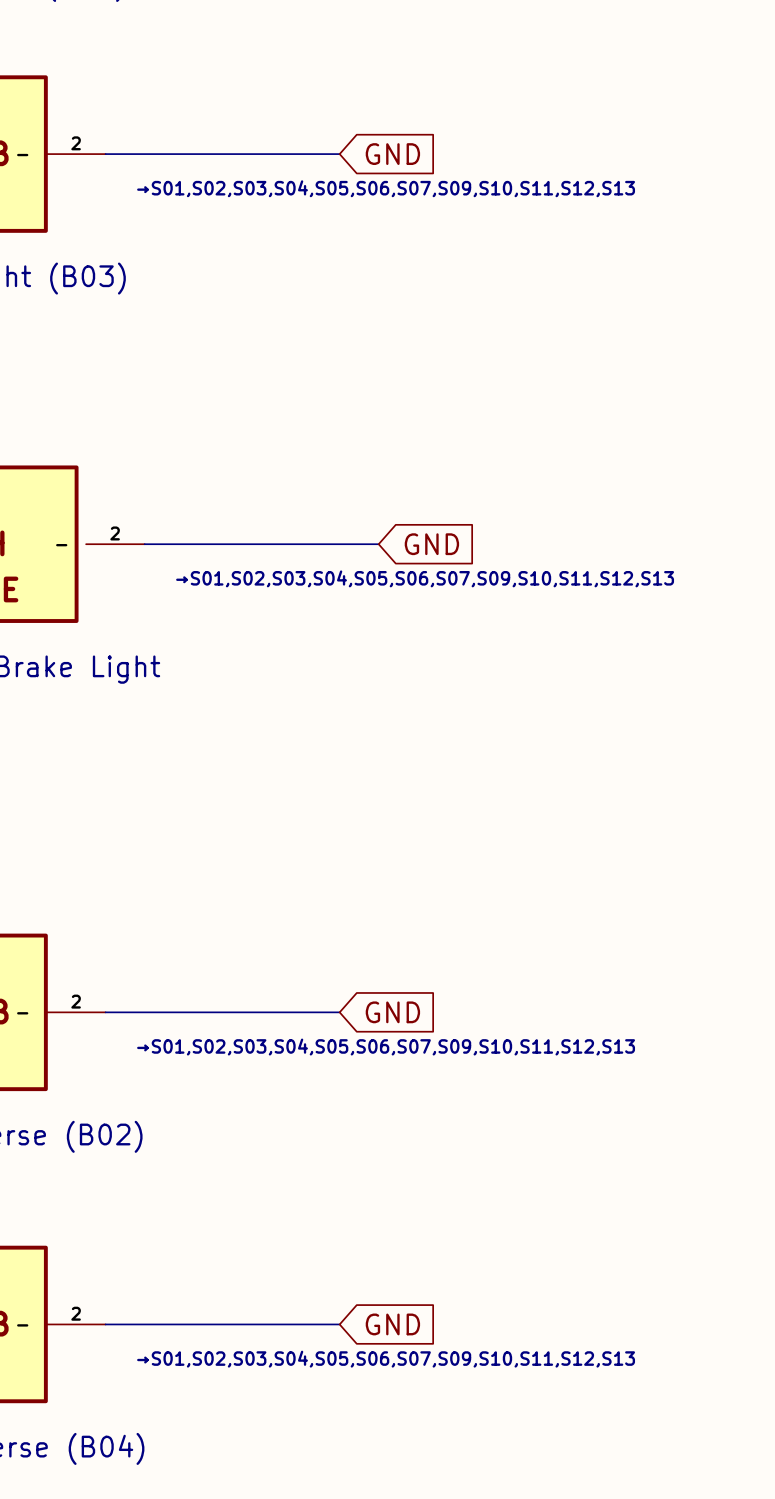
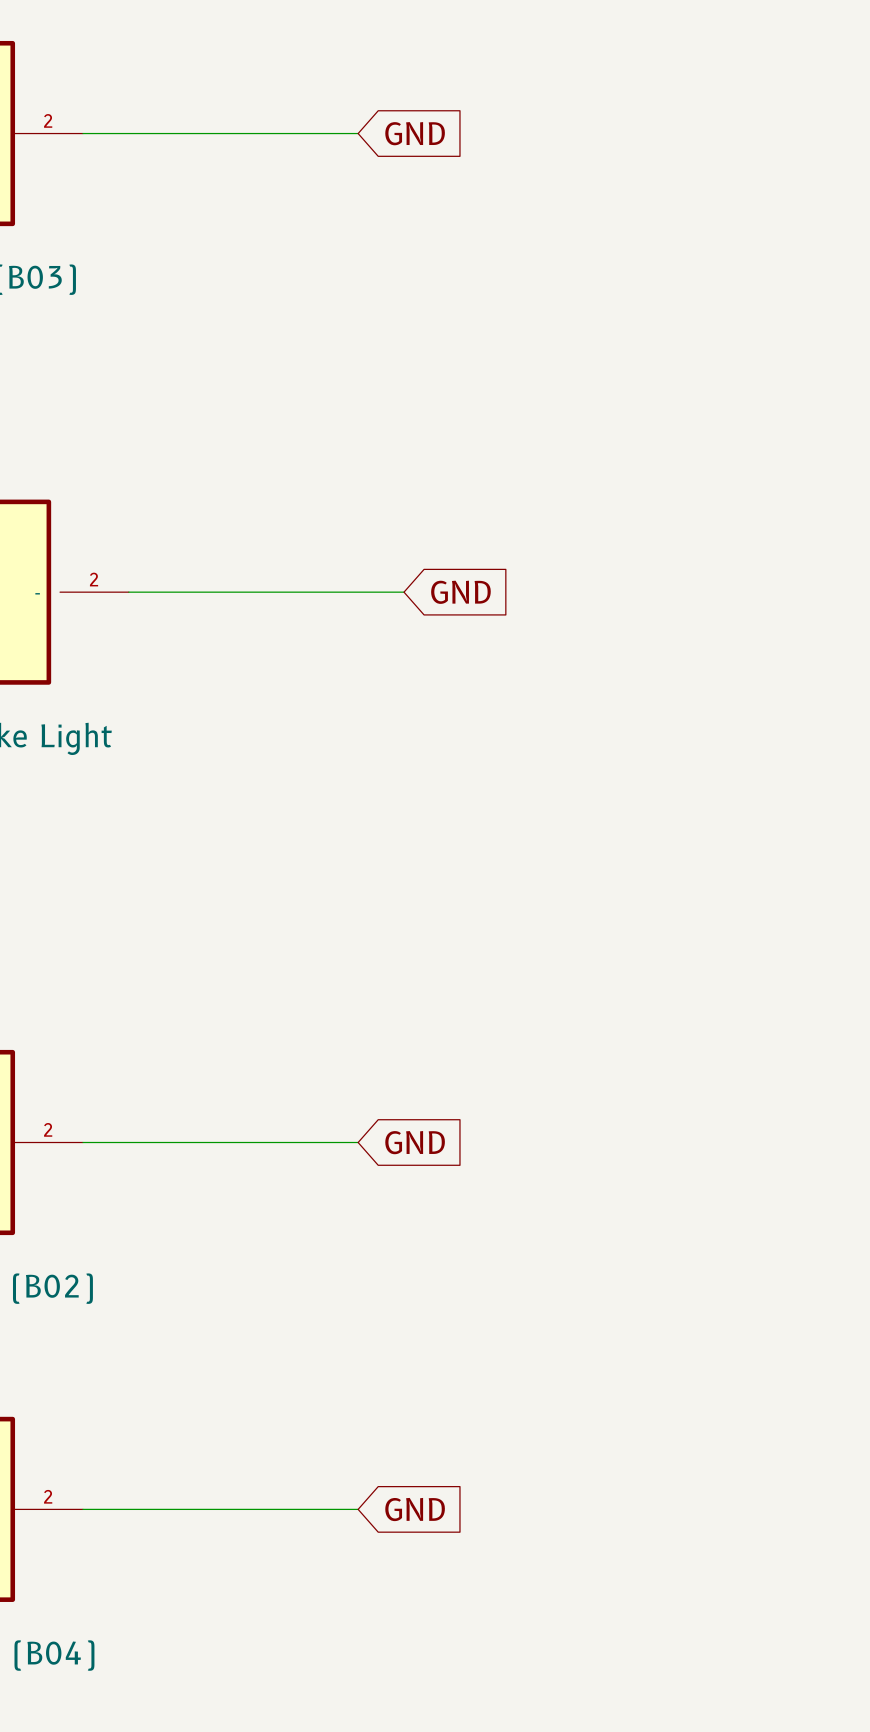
text: →S01,S02,S03,S04,S05,S06,S07,S09,S10,S11,S12,S13 (386, 188) -> none
text: →S01,S02,S03,S04,S05,S06,S07,S09,S10,S11,S12,S13 (425, 578) -> none
text: →S01,S02,S03,S04,S05,S06,S07,S09,S10,S11,S12,S13 (386, 1047) -> none
text: →S01,S02,S03,S04,S05,S06,S07,S09,S10,S11,S12,S13 (386, 1359) -> none

